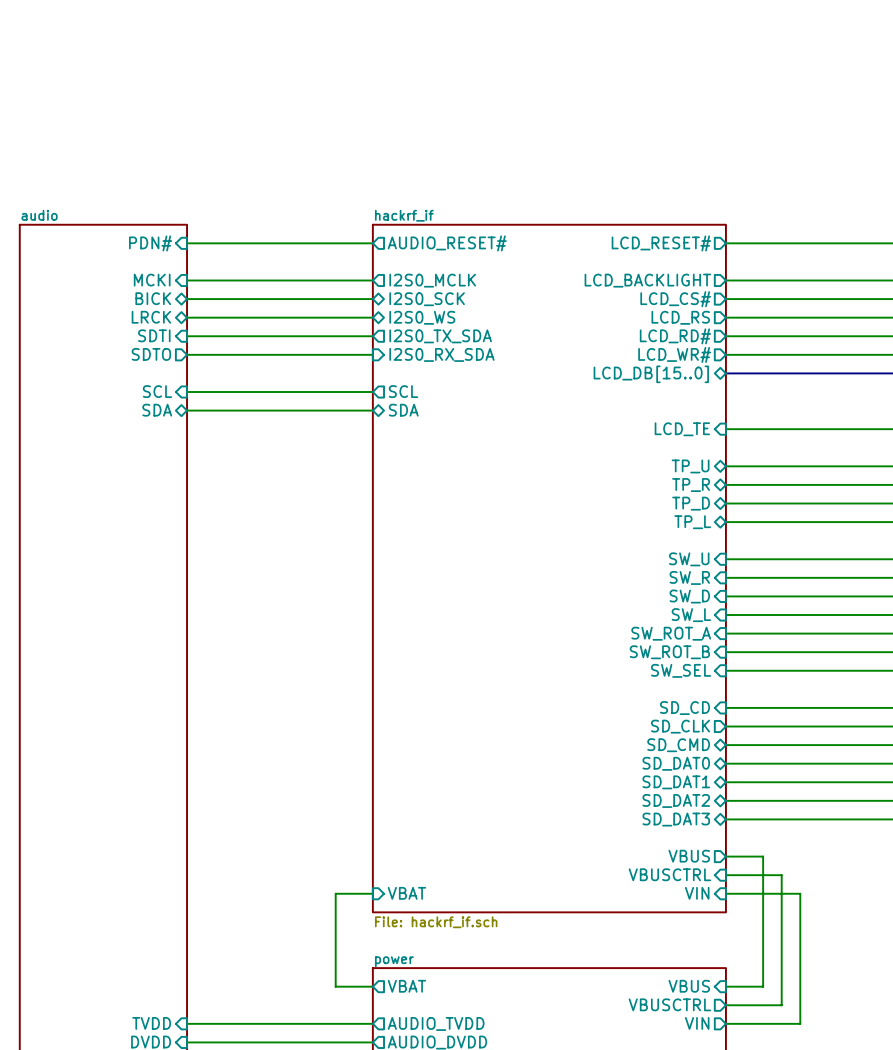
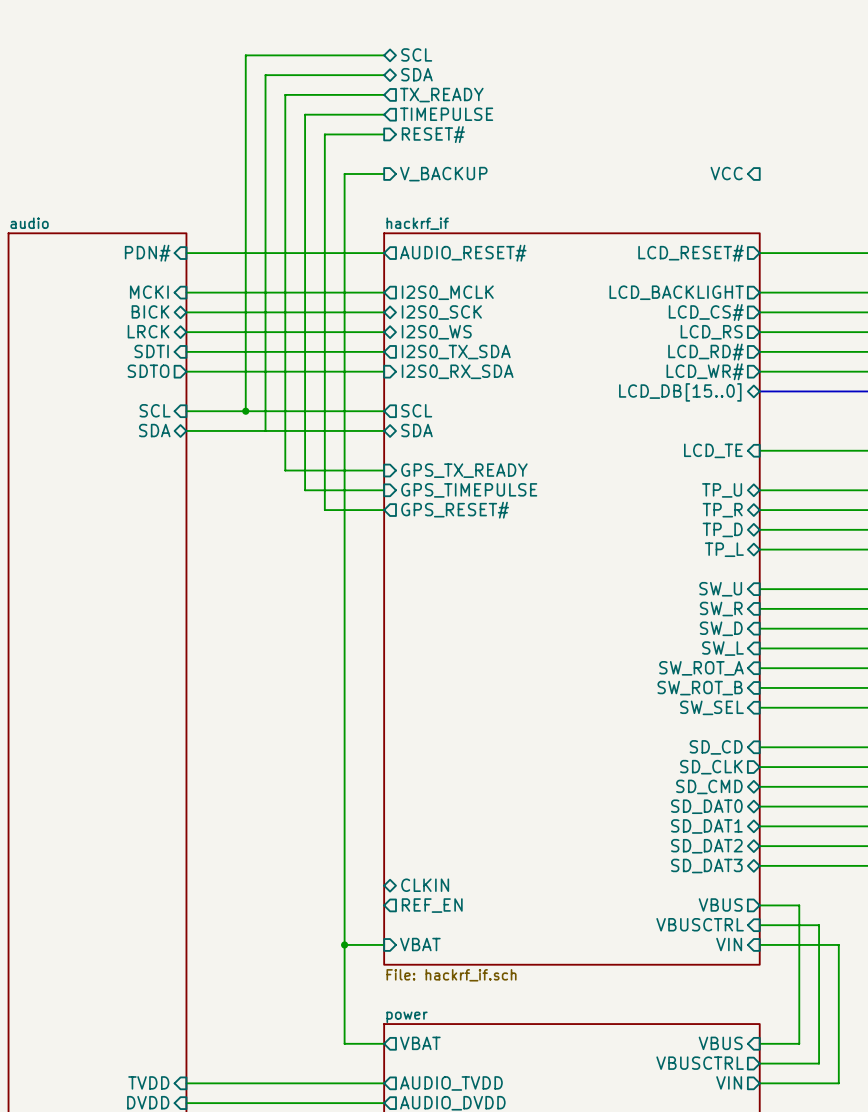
wire: none -> (384, 55) (245, 55) (245, 411)
sheet pin: none -> SCL (416, 54)
sheet pin: none -> SDA (416, 74)
wire: none -> (384, 75) (265, 75) (265, 430)
wire: none -> (384, 94) (285, 94) (285, 470) (384, 470)
sheet pin: none -> TX_READY (441, 95)
sheet pin: none -> TIMEPULSE (446, 114)
wire: none -> (384, 114) (305, 114) (305, 490) (384, 490)
wire: none -> (384, 134) (324, 134) (324, 510) (384, 510)
sheet pin: none -> RESET# (433, 134)
wire: none -> (384, 173) (344, 173) (344, 944)
sheet pin: none -> VCC (726, 173)
sheet pin: none -> V_BACKUP (443, 174)
junction: none -> (245, 411)
sheet pin: none -> GPS_TX_READY (464, 470)
sheet pin: none -> GPS_TIMEPULSE (469, 490)
sheet pin: none -> GPS_RESET# (455, 510)
sheet pin: none -> CLKIN (425, 885)
sheet pin: none -> REF_EN (432, 905)
junction: none -> (344, 944)

